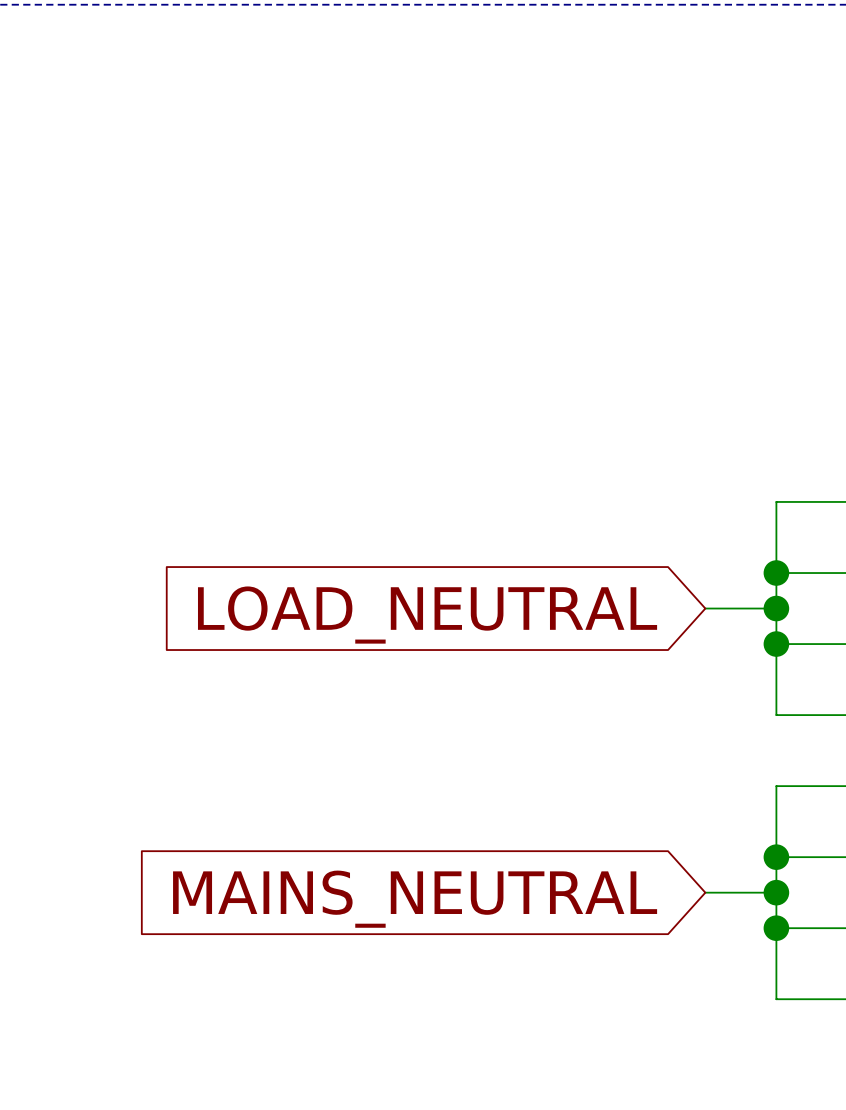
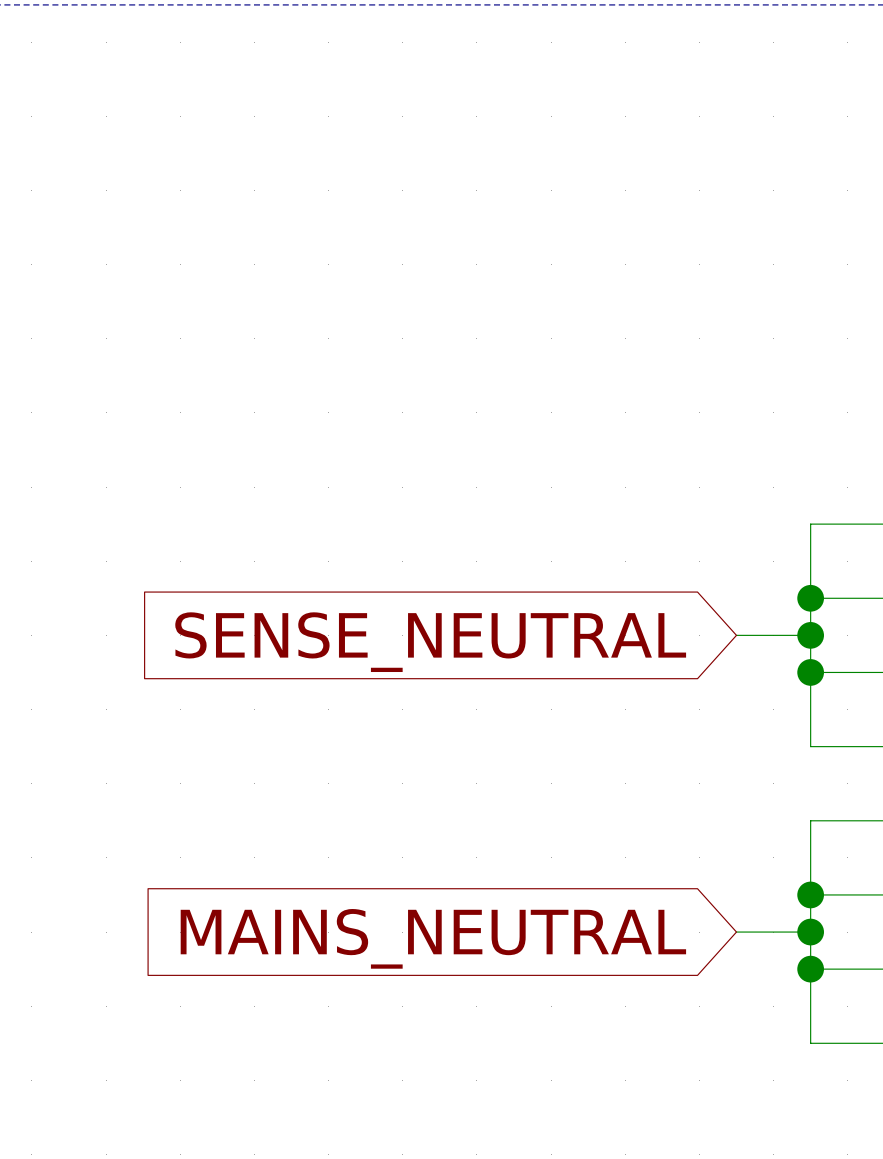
global label: LOAD_NEUTRAL (427, 615) -> SENSE_NEUTRAL (430, 642)

